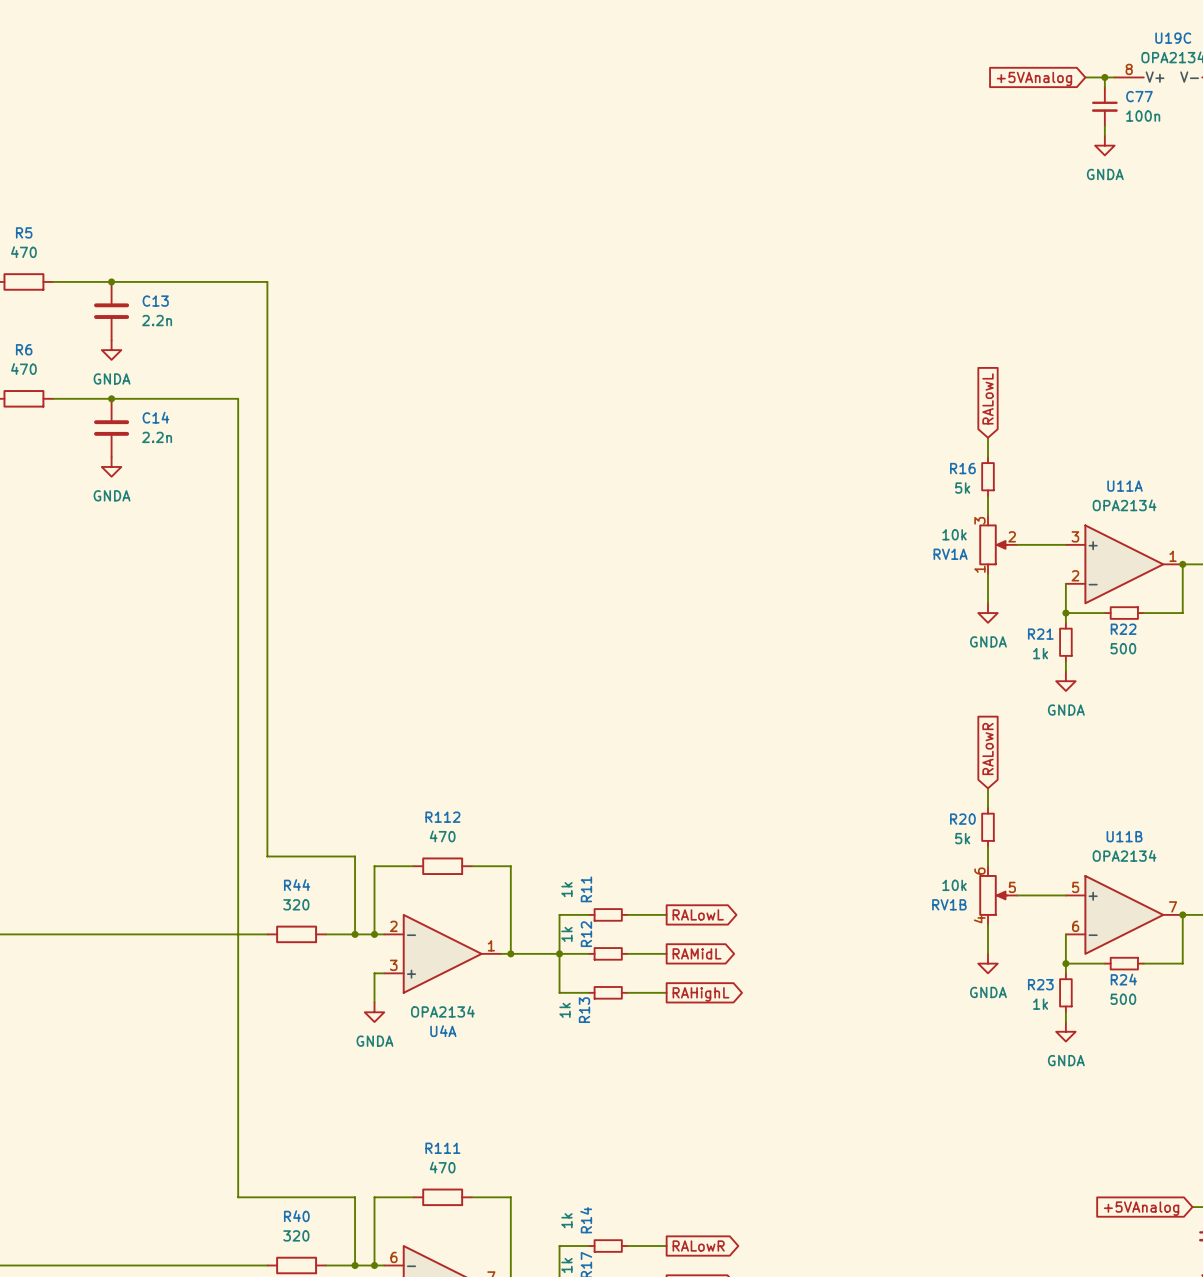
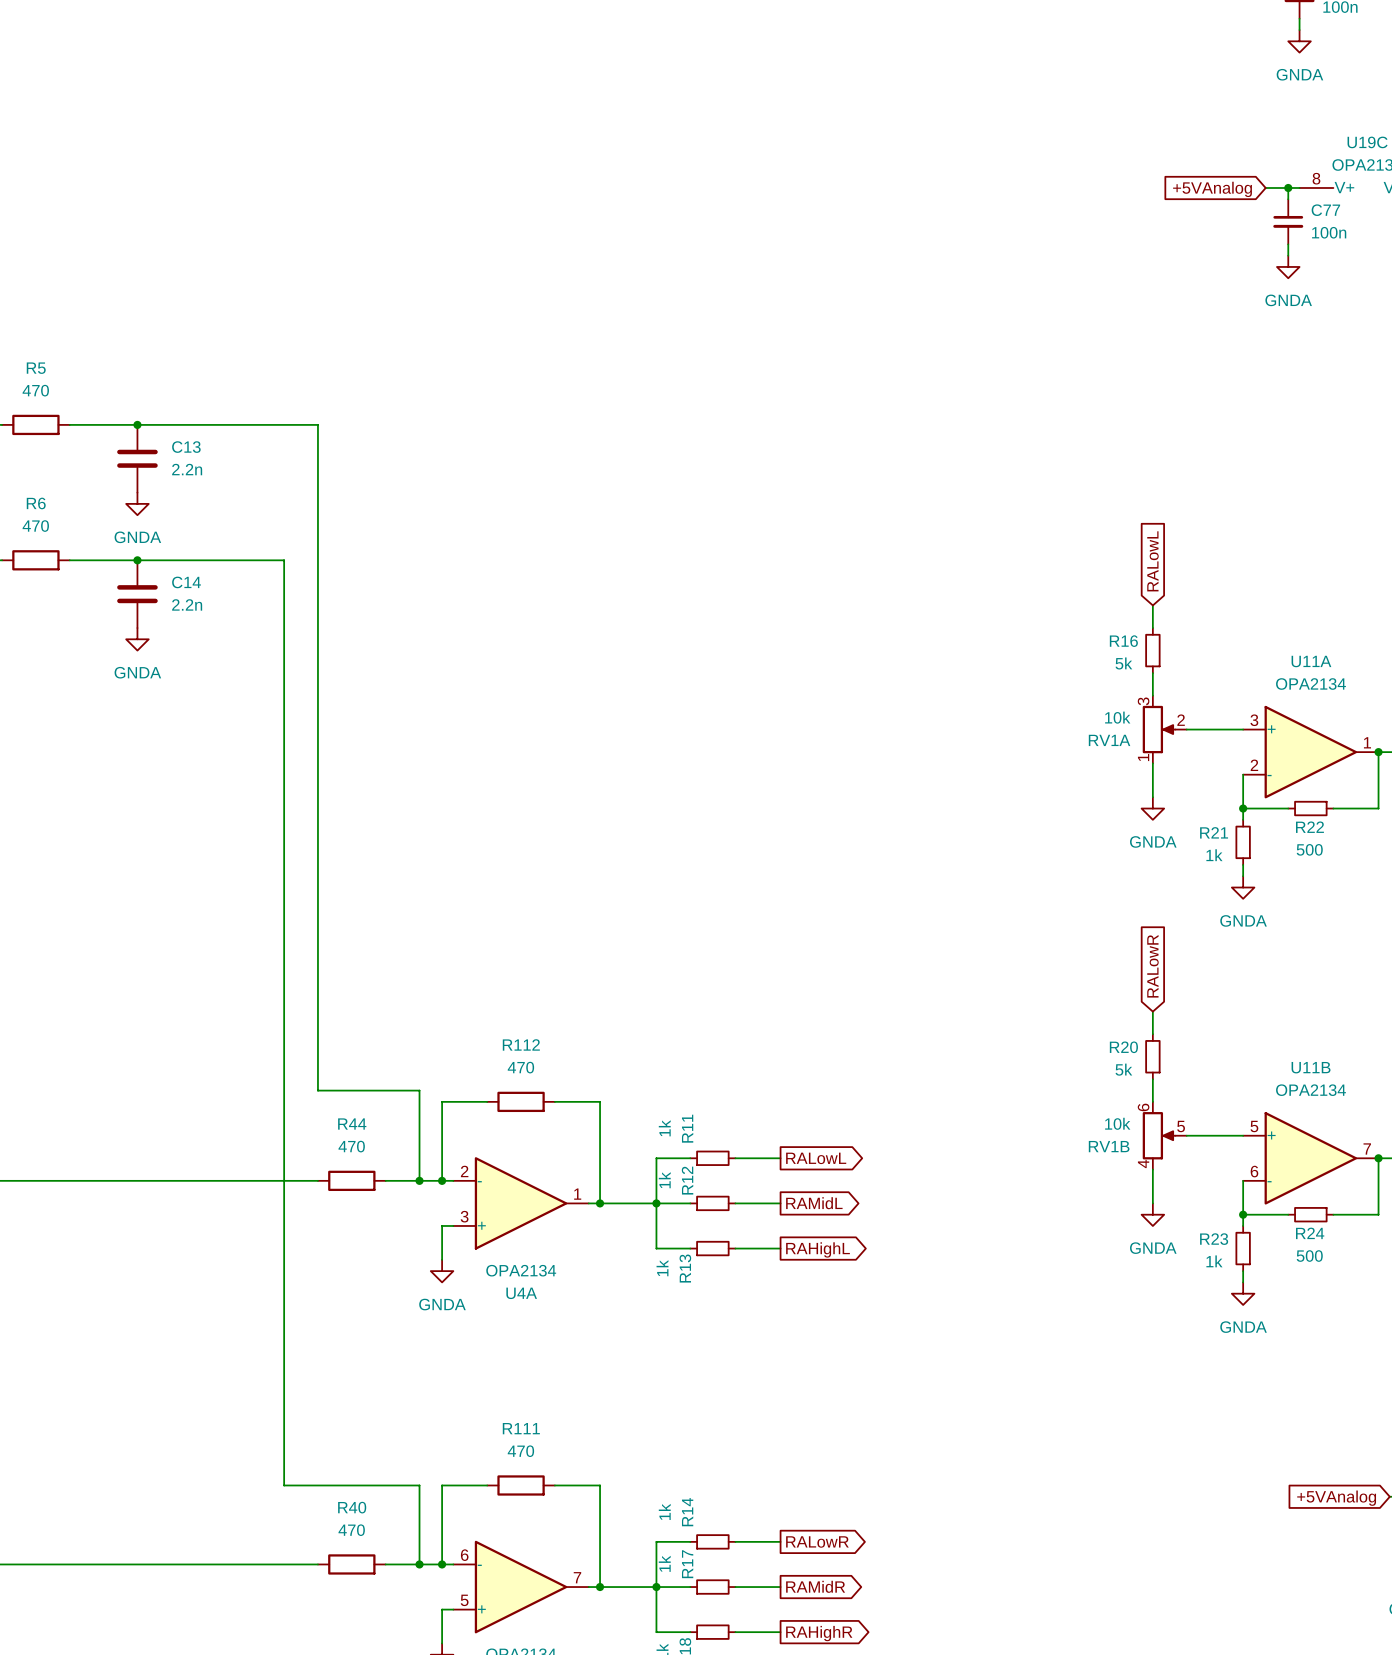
R44 value: 320 (296, 904) -> 470 (351, 1146)
R40 value: 320 (296, 1235) -> 470 (351, 1530)

